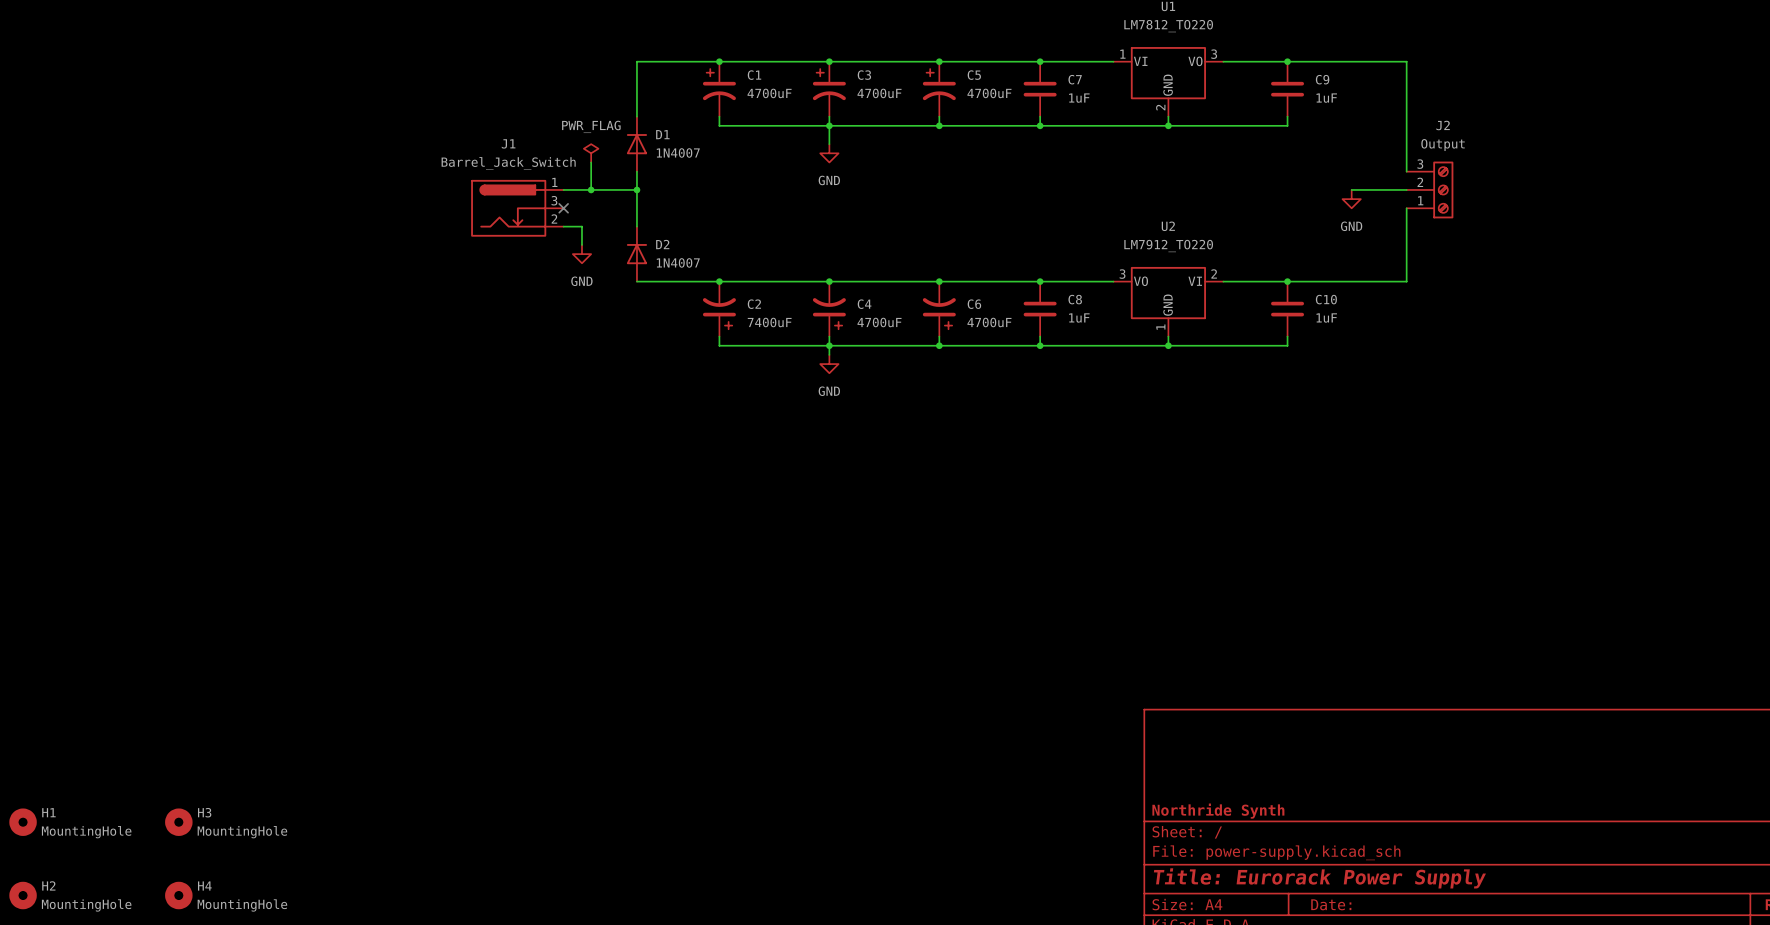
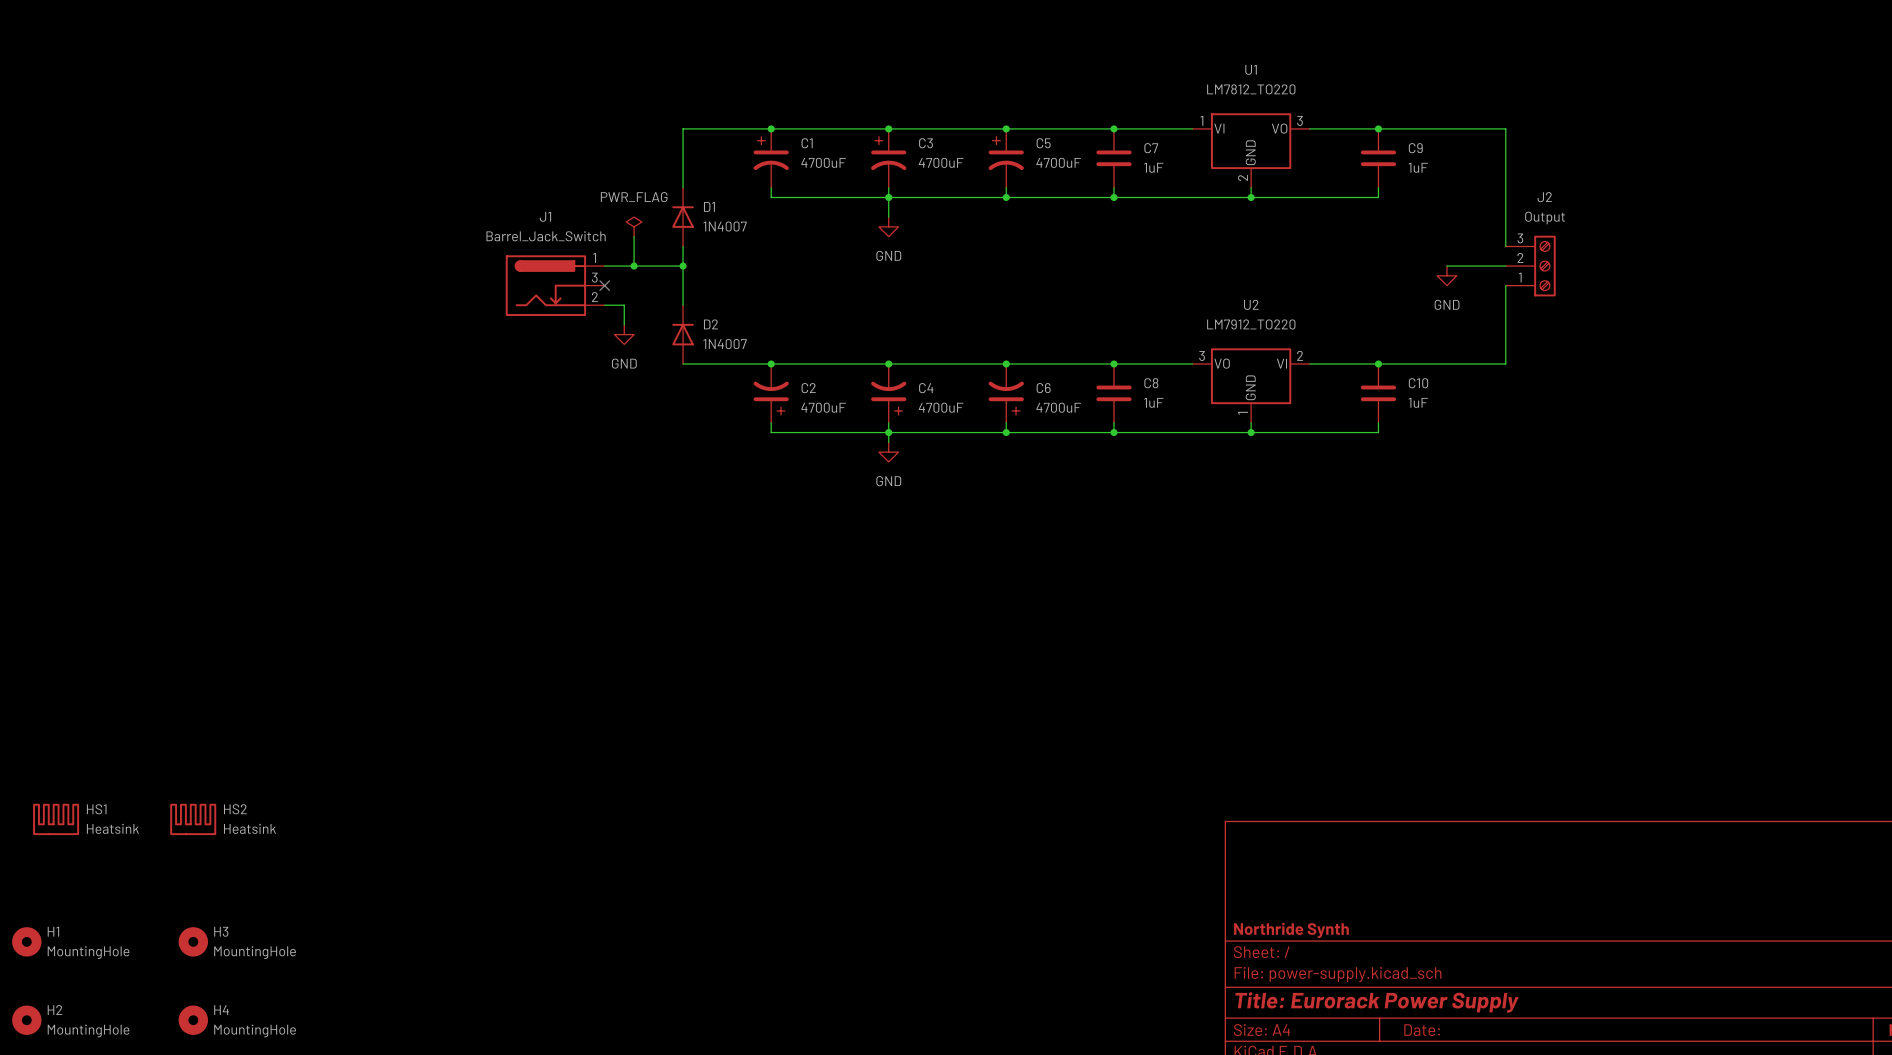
C2 value: 7400uF (769, 322) -> 4700uF (823, 407)
HS1: none -> Heatsink (56, 819)
HS2: none -> Heatsink (193, 819)

